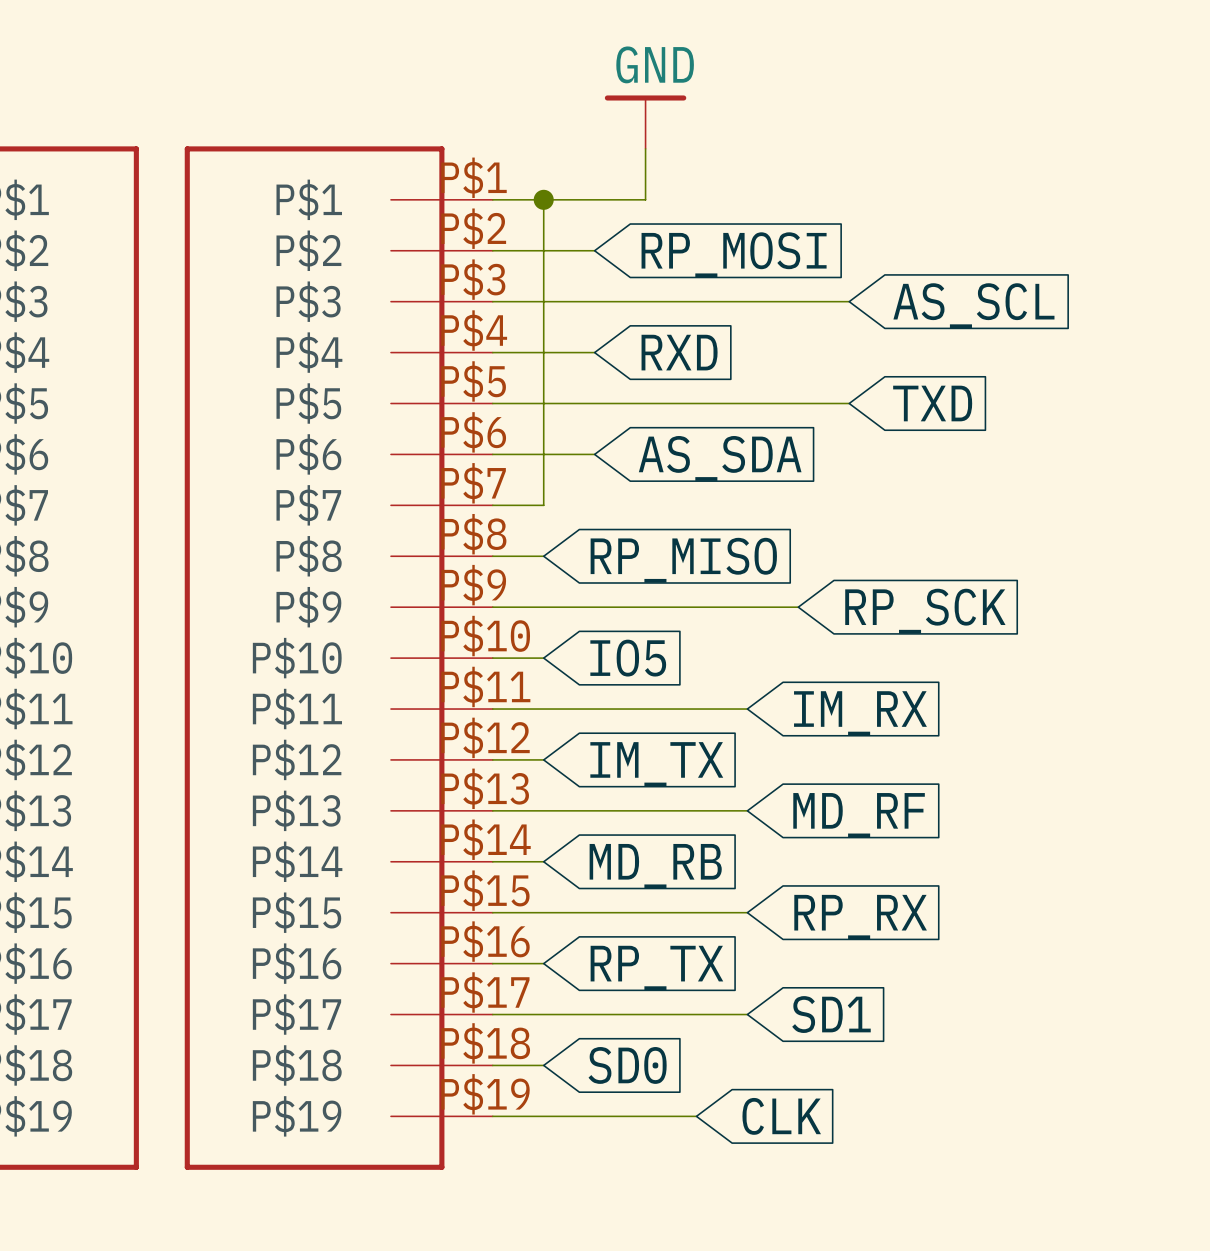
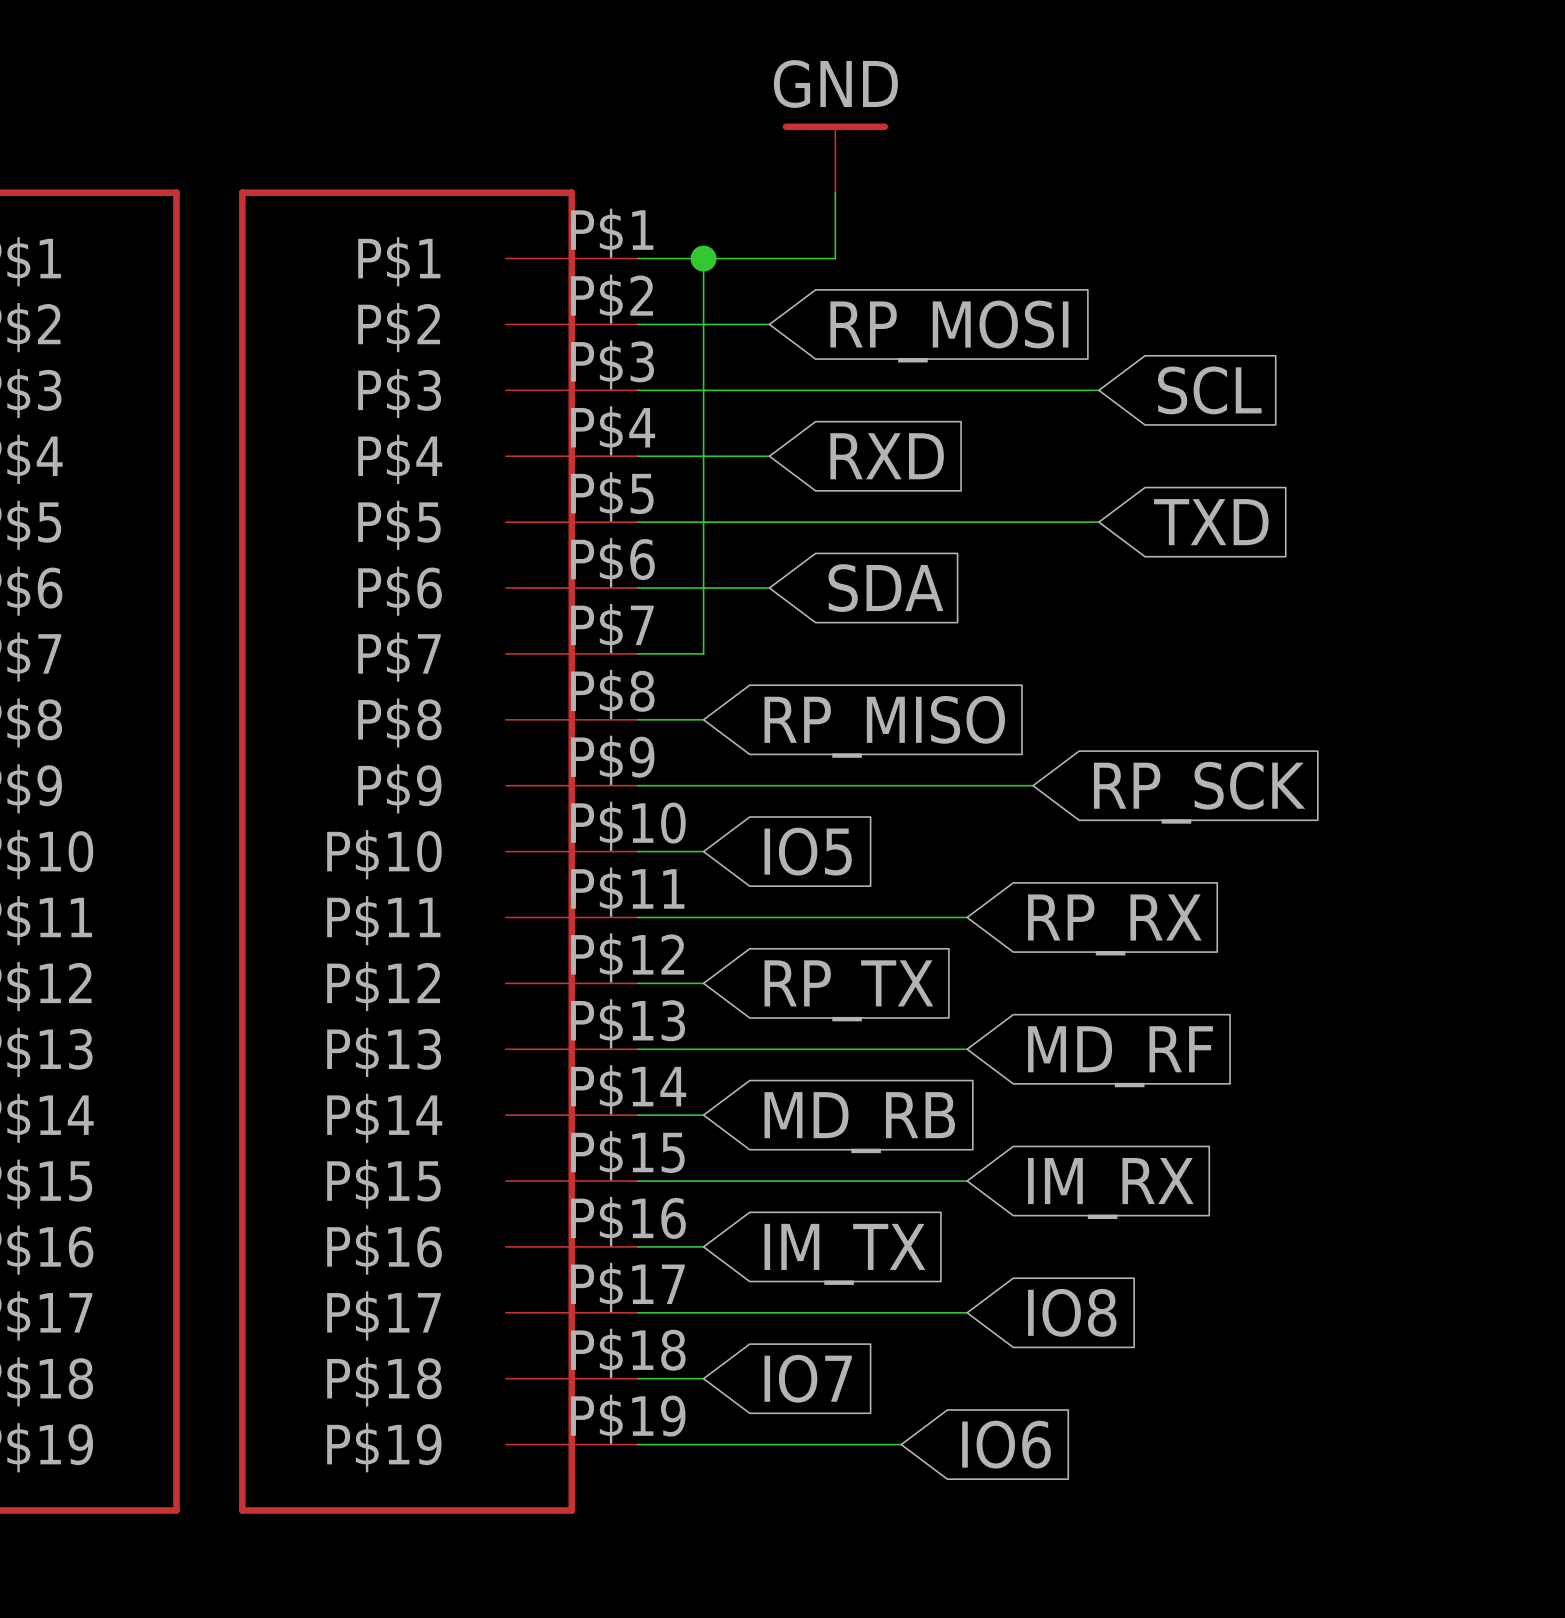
global label: AS_SCL (973, 305) -> SCL (1209, 390)
global label: AS_SDA (720, 458) -> SDA (885, 588)
global label: IM_RX (860, 713) -> RP_RX (1114, 924)
global label: IM_TX (656, 764) -> RP_TX (848, 990)
global label: RP_RX (860, 917) -> IM_RX (1110, 1188)
global label: RP_TX (656, 967) -> IM_TX (844, 1254)
global label: SD1 (831, 1014) -> IO8 (1072, 1312)
global label: SD0 (627, 1065) -> IO7 (808, 1378)
global label: CLK (781, 1116) -> IO6 (1006, 1444)

